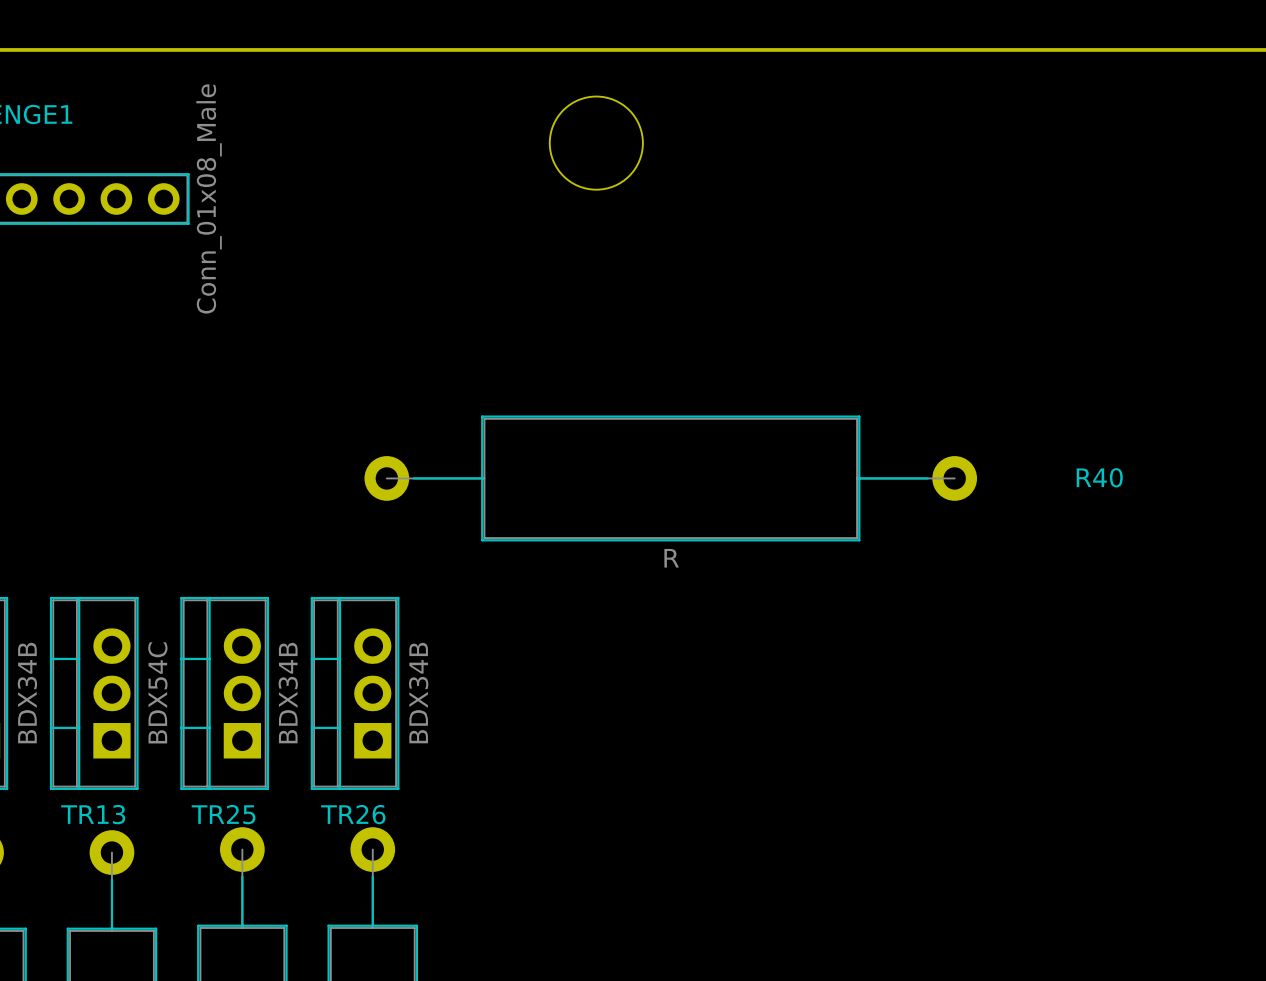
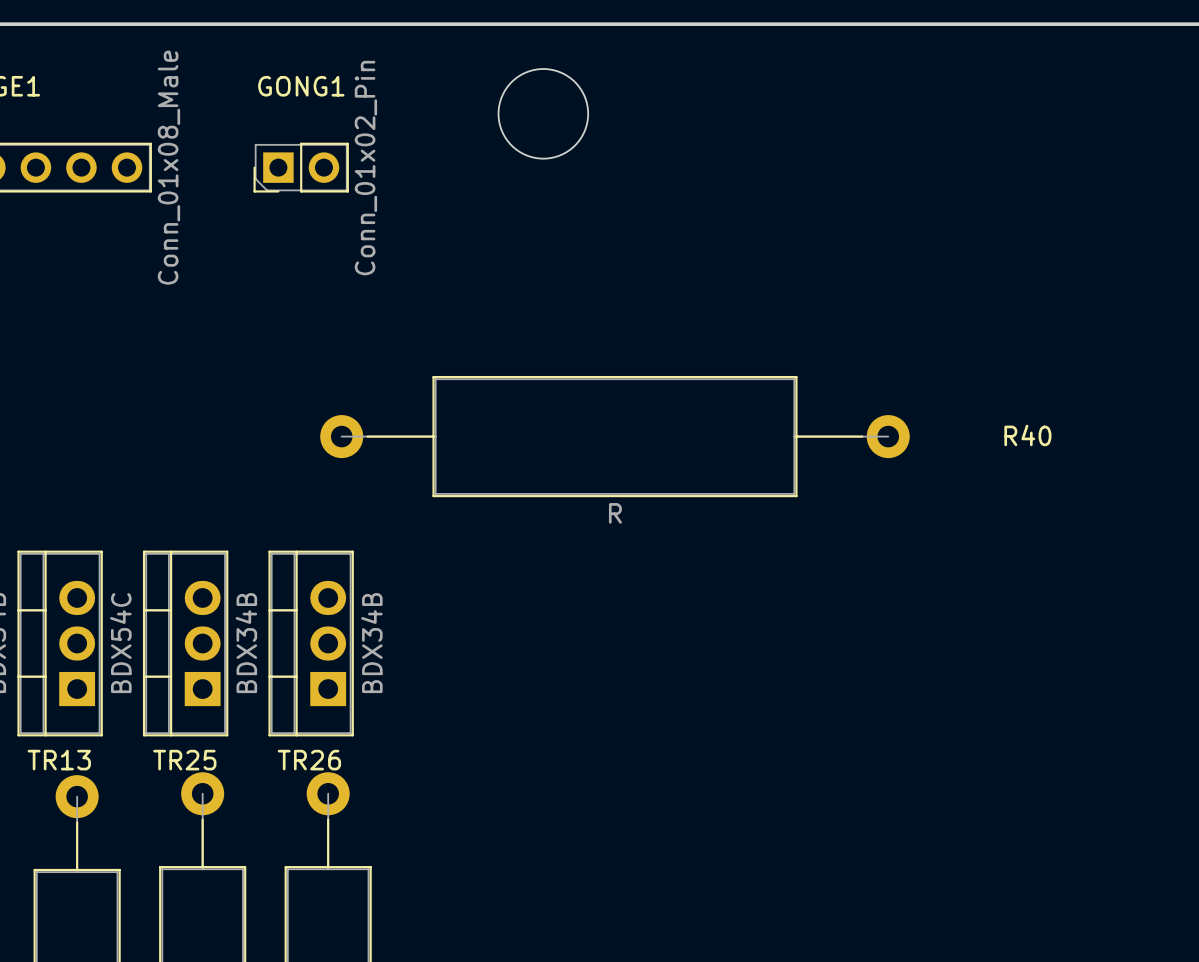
GONG1: none -> Conn_01x02_Pin (301, 167)

